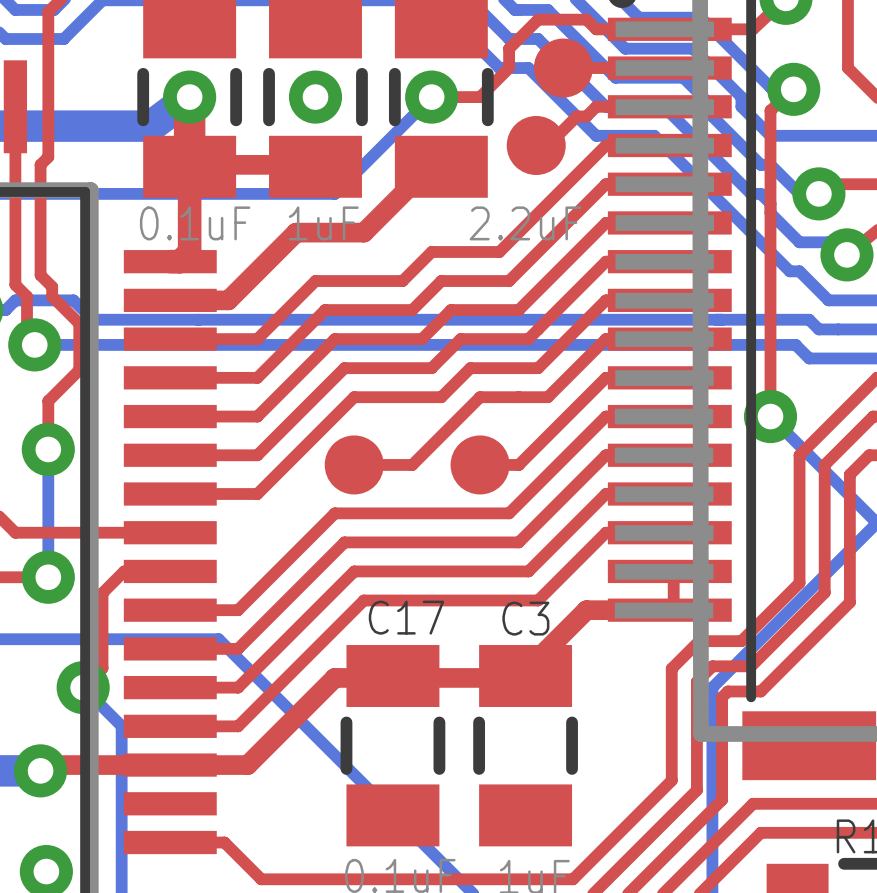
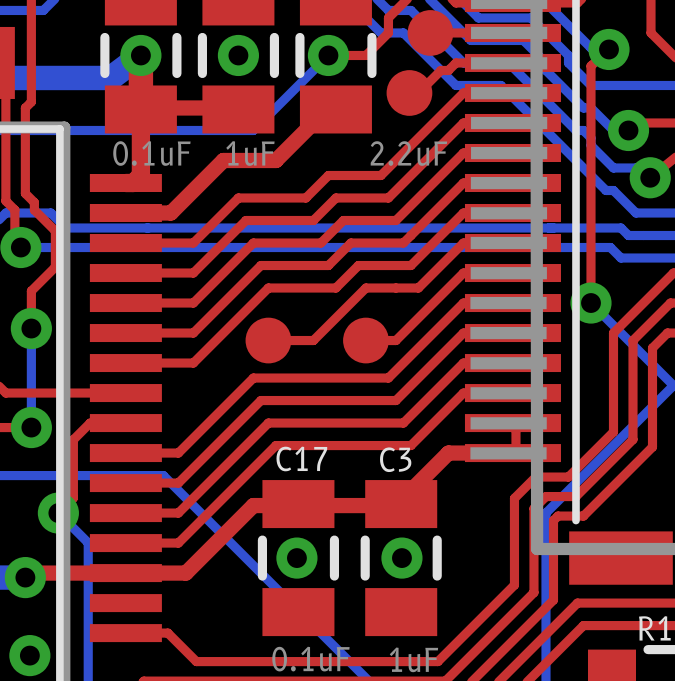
via: none -> (296, 558)
via: none -> (401, 558)

